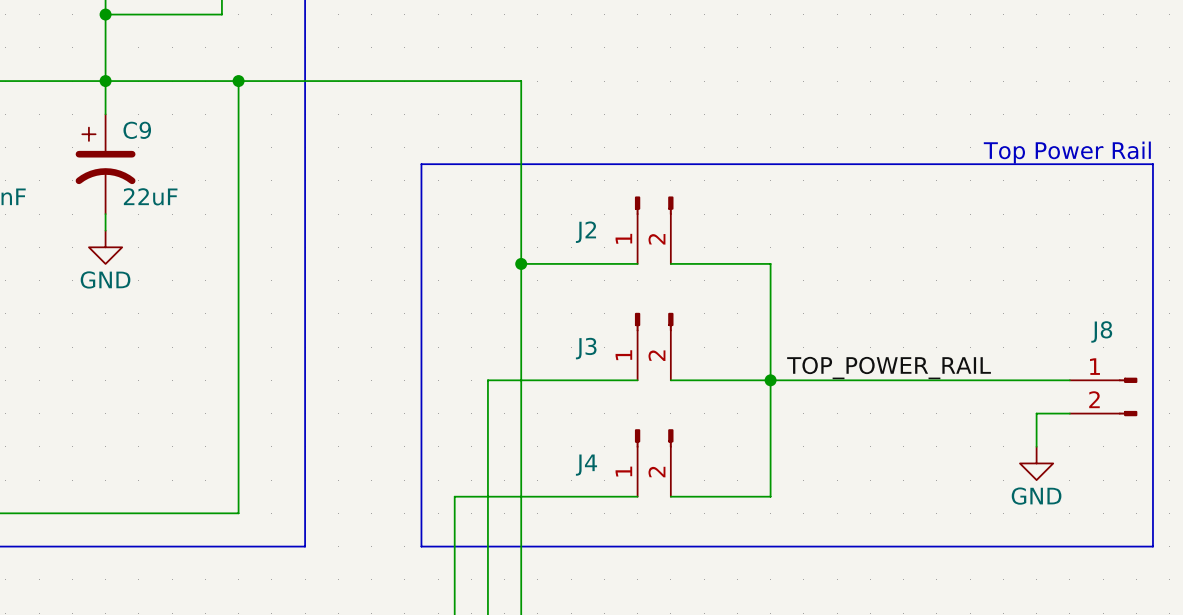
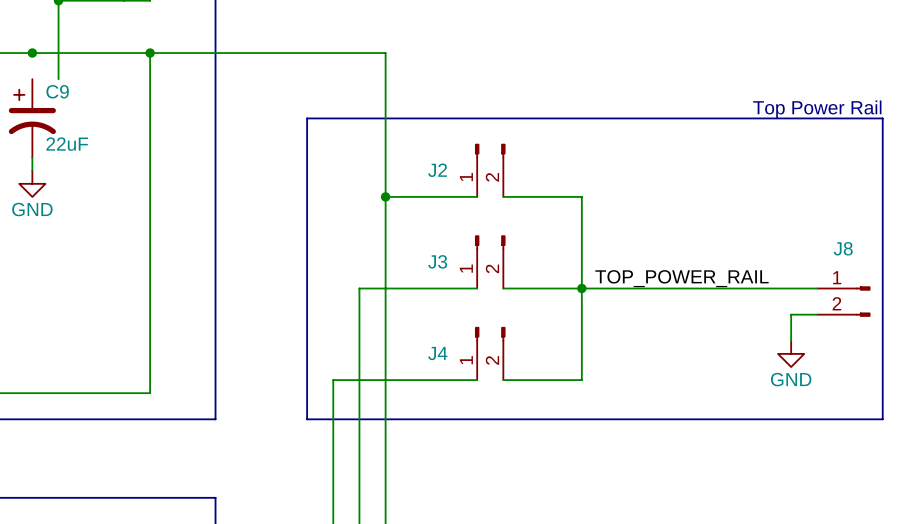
junction position: (105, 81) -> (32, 53)
wire: (238, 81) (238, 513) (221, 513) -> (150, 53) (150, 393)
junction position: (238, 81) -> (150, 53)
C9 position: (105, 164) -> (32, 118)
wire: (105, 214) (105, 230) -> (32, 157) (32, 170)
power symbol position: GND (105, 247) -> GND (32, 183)

